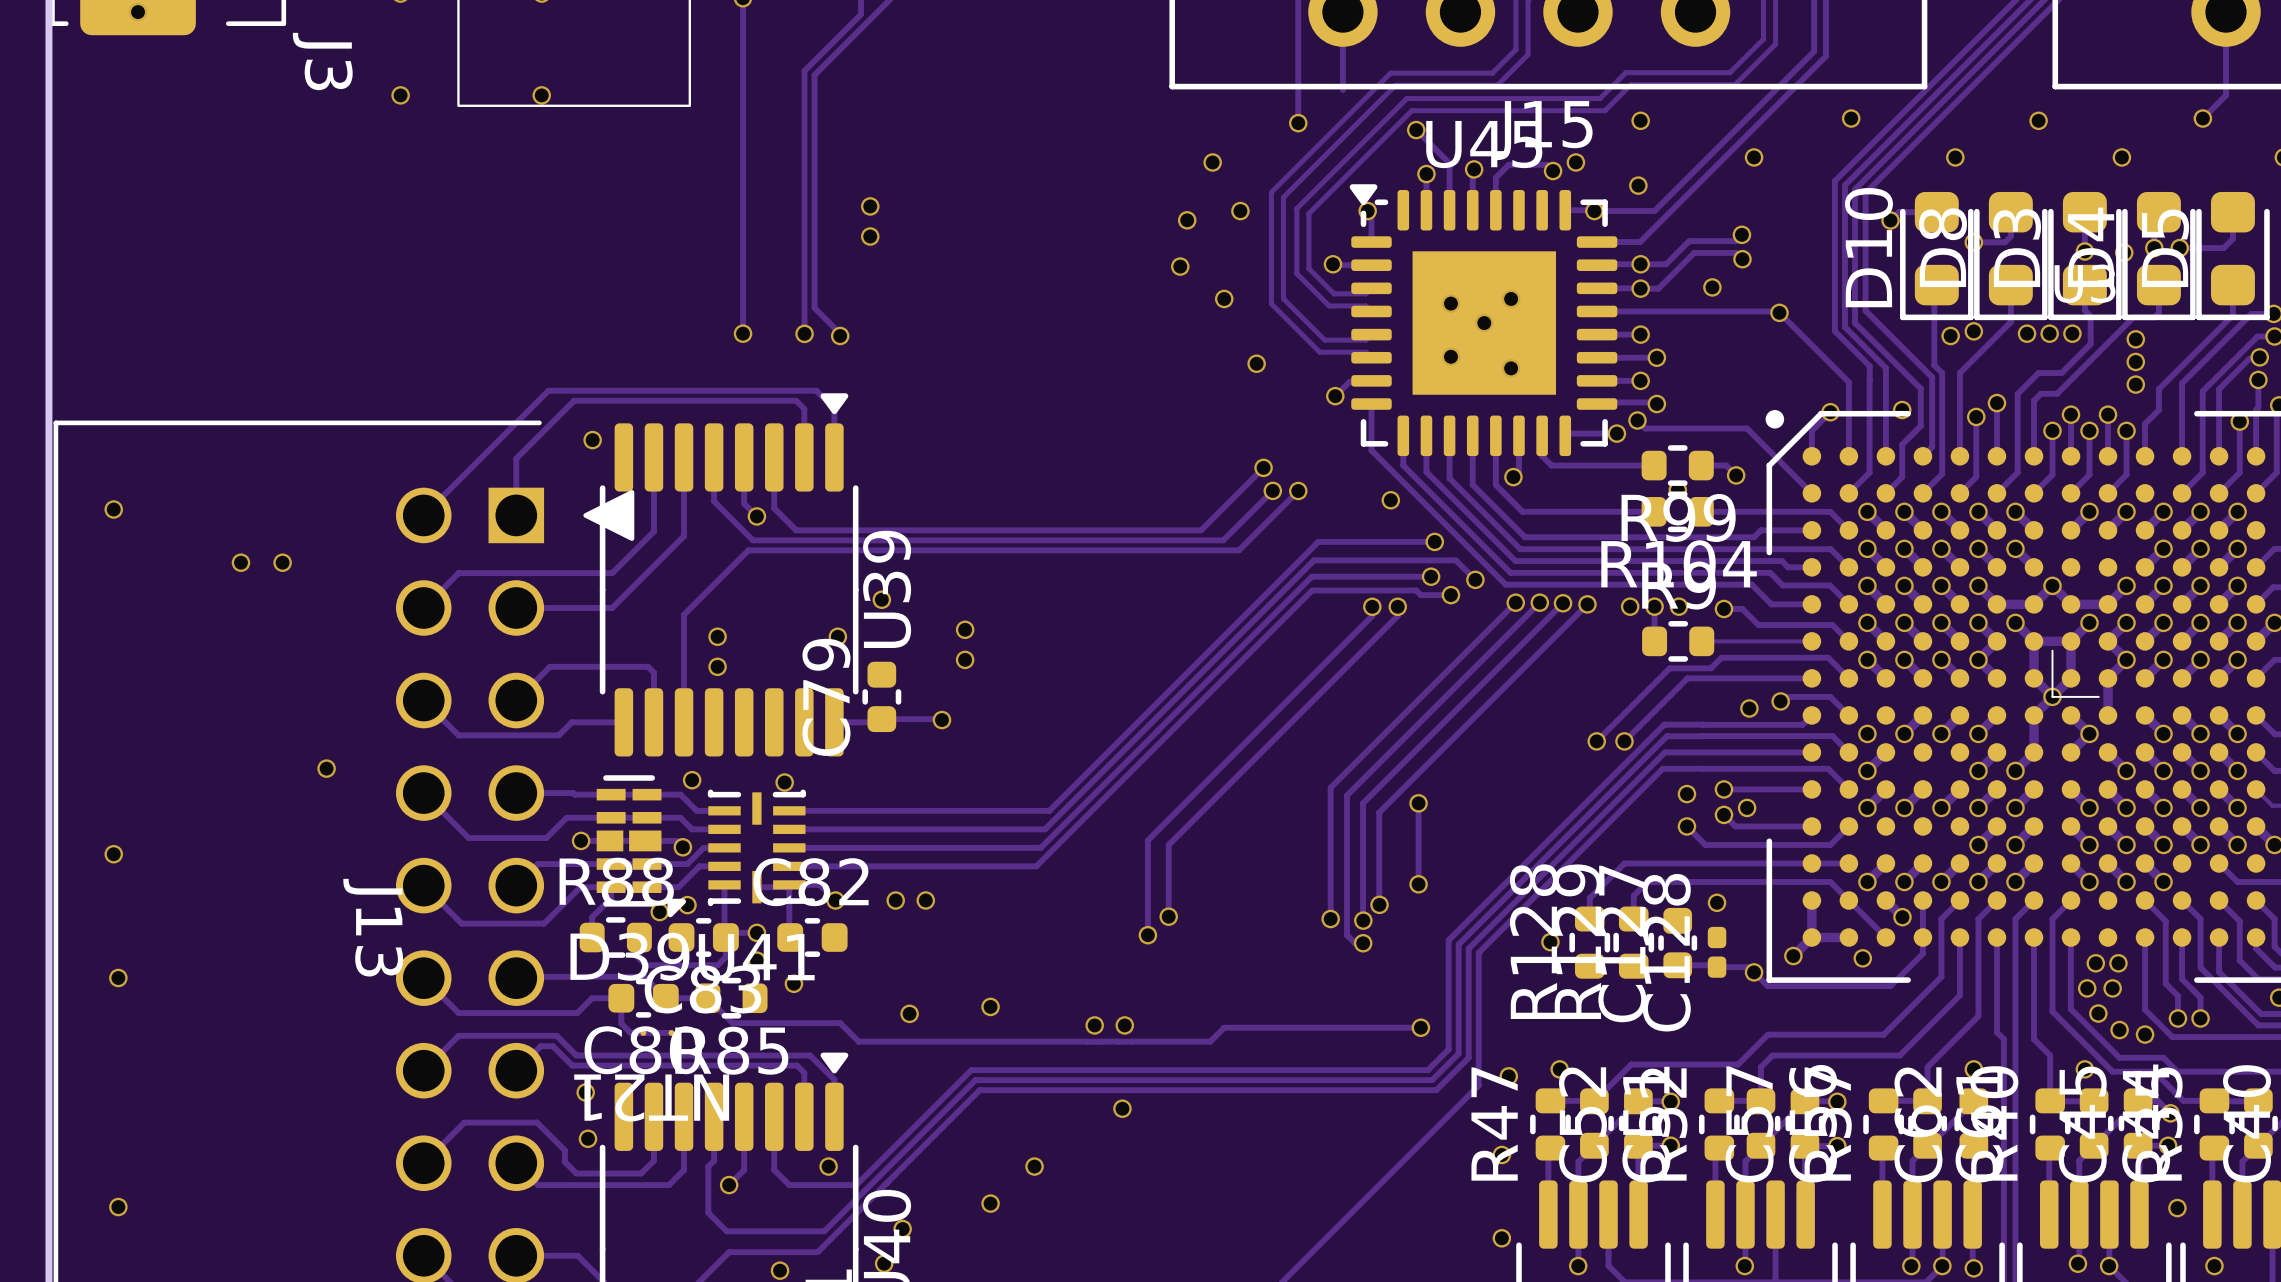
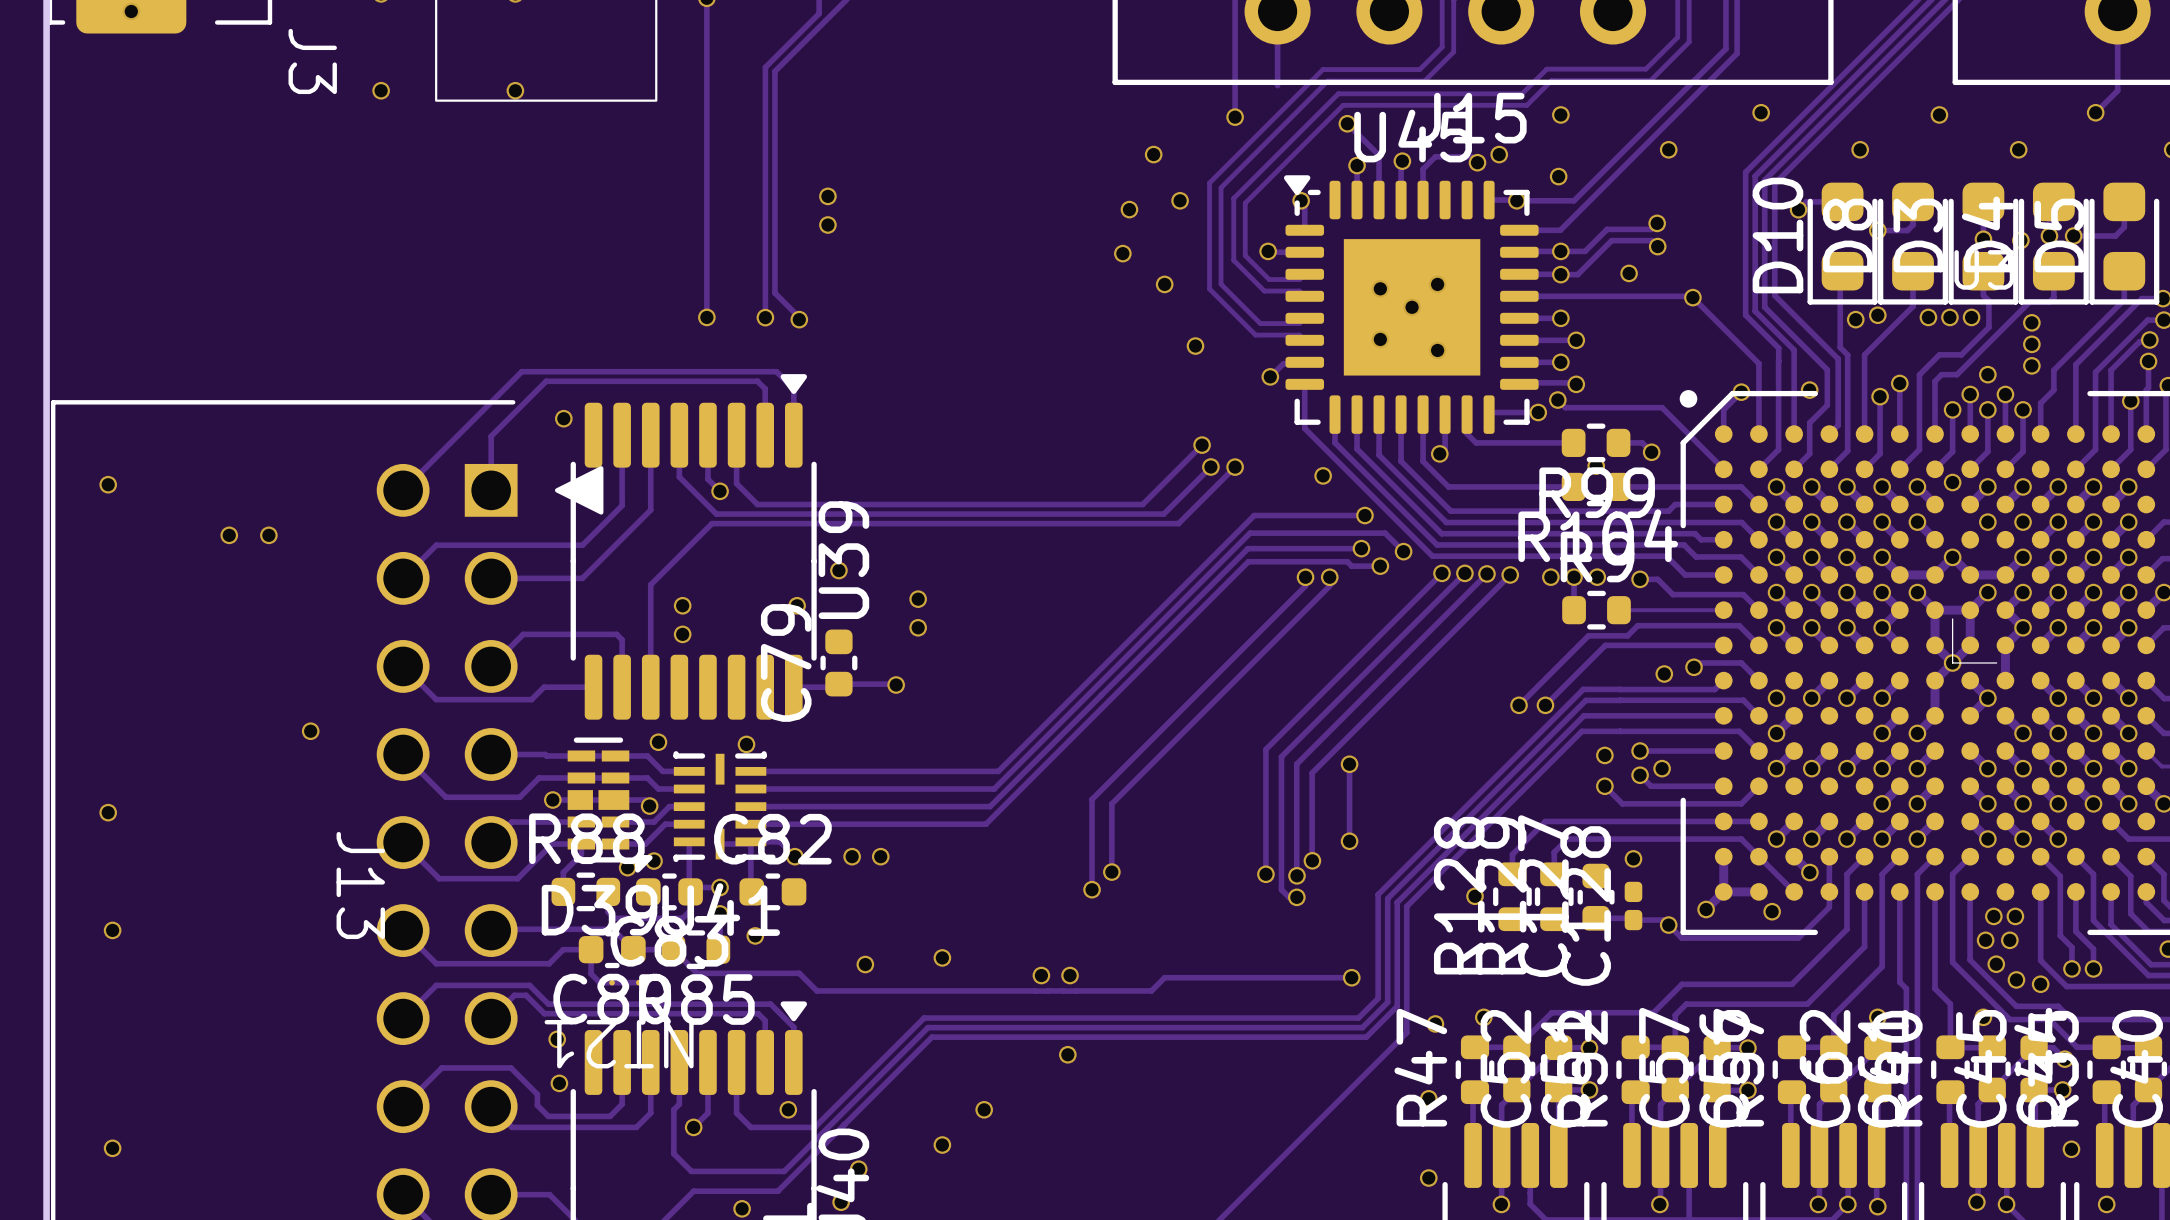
via: none -> (1987, 374)
via: none -> (1952, 482)
via: none -> (1987, 522)
via: none -> (2023, 522)

